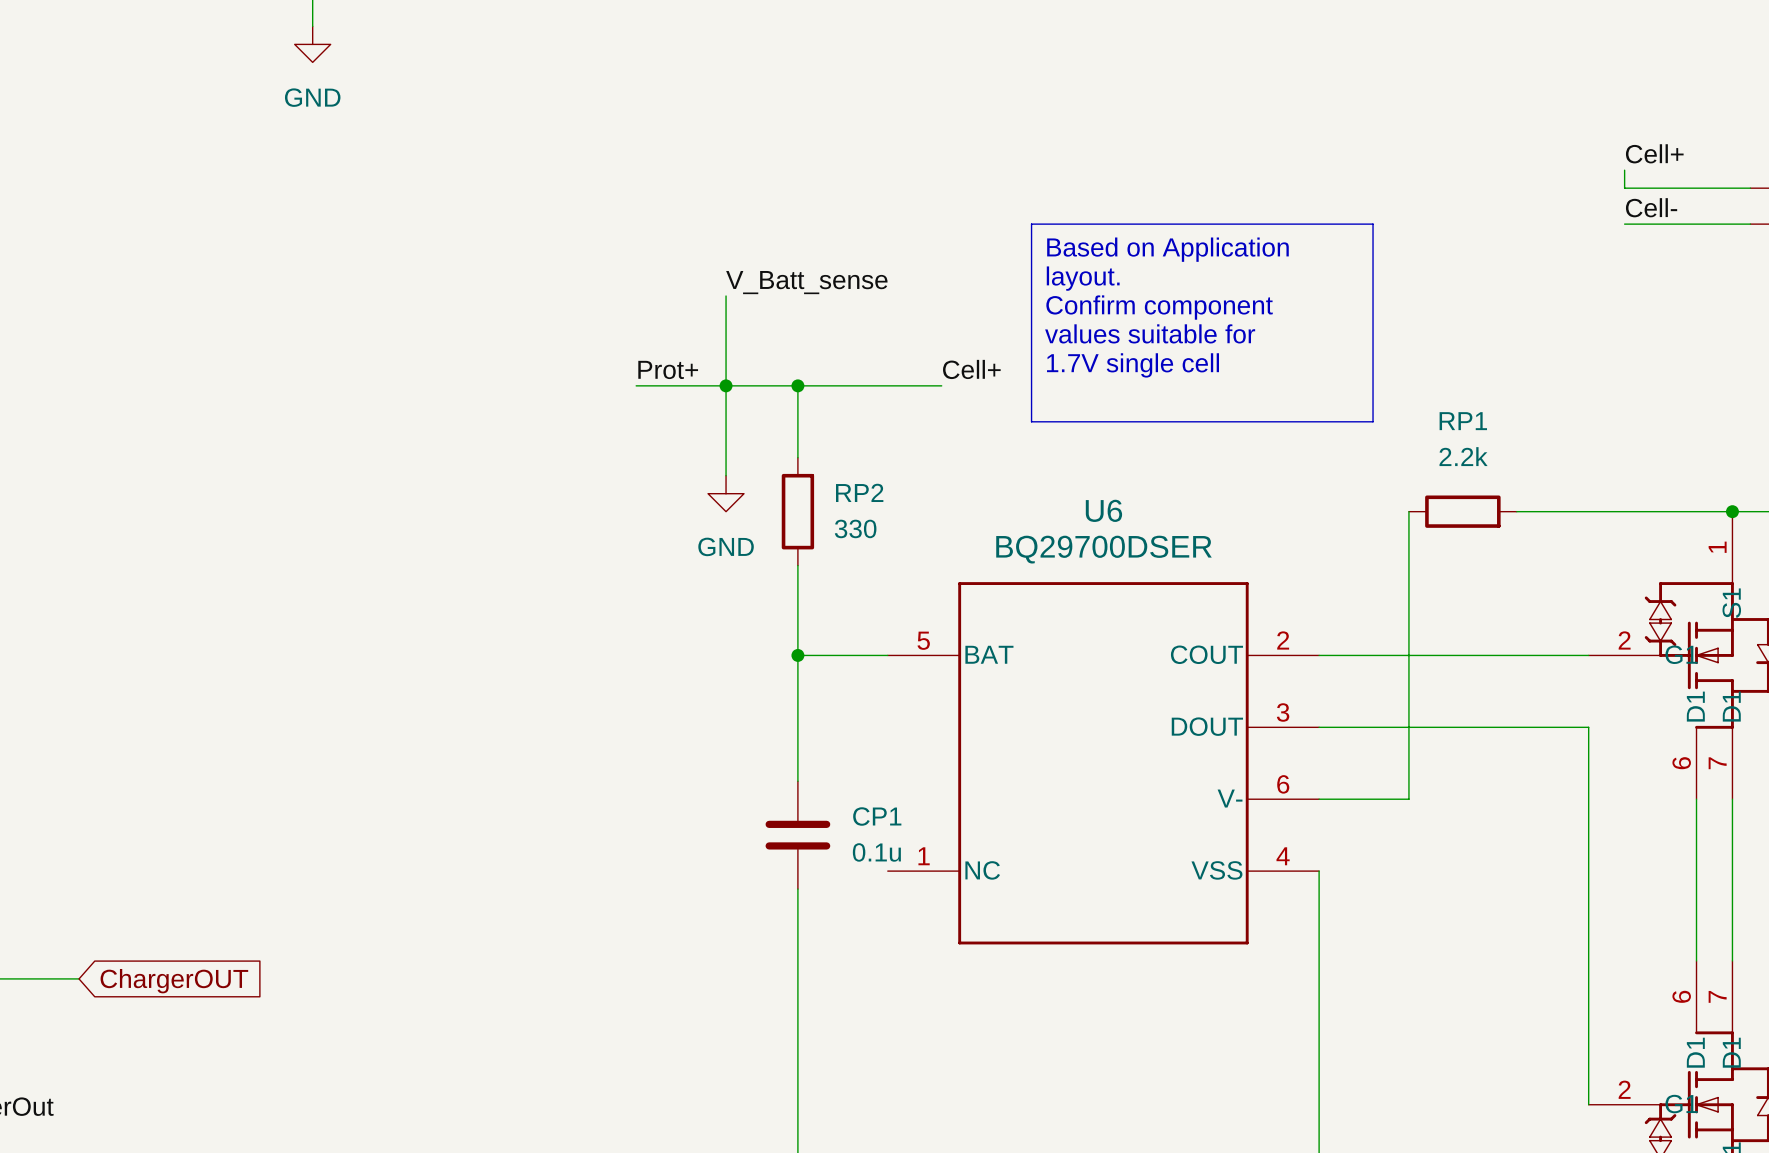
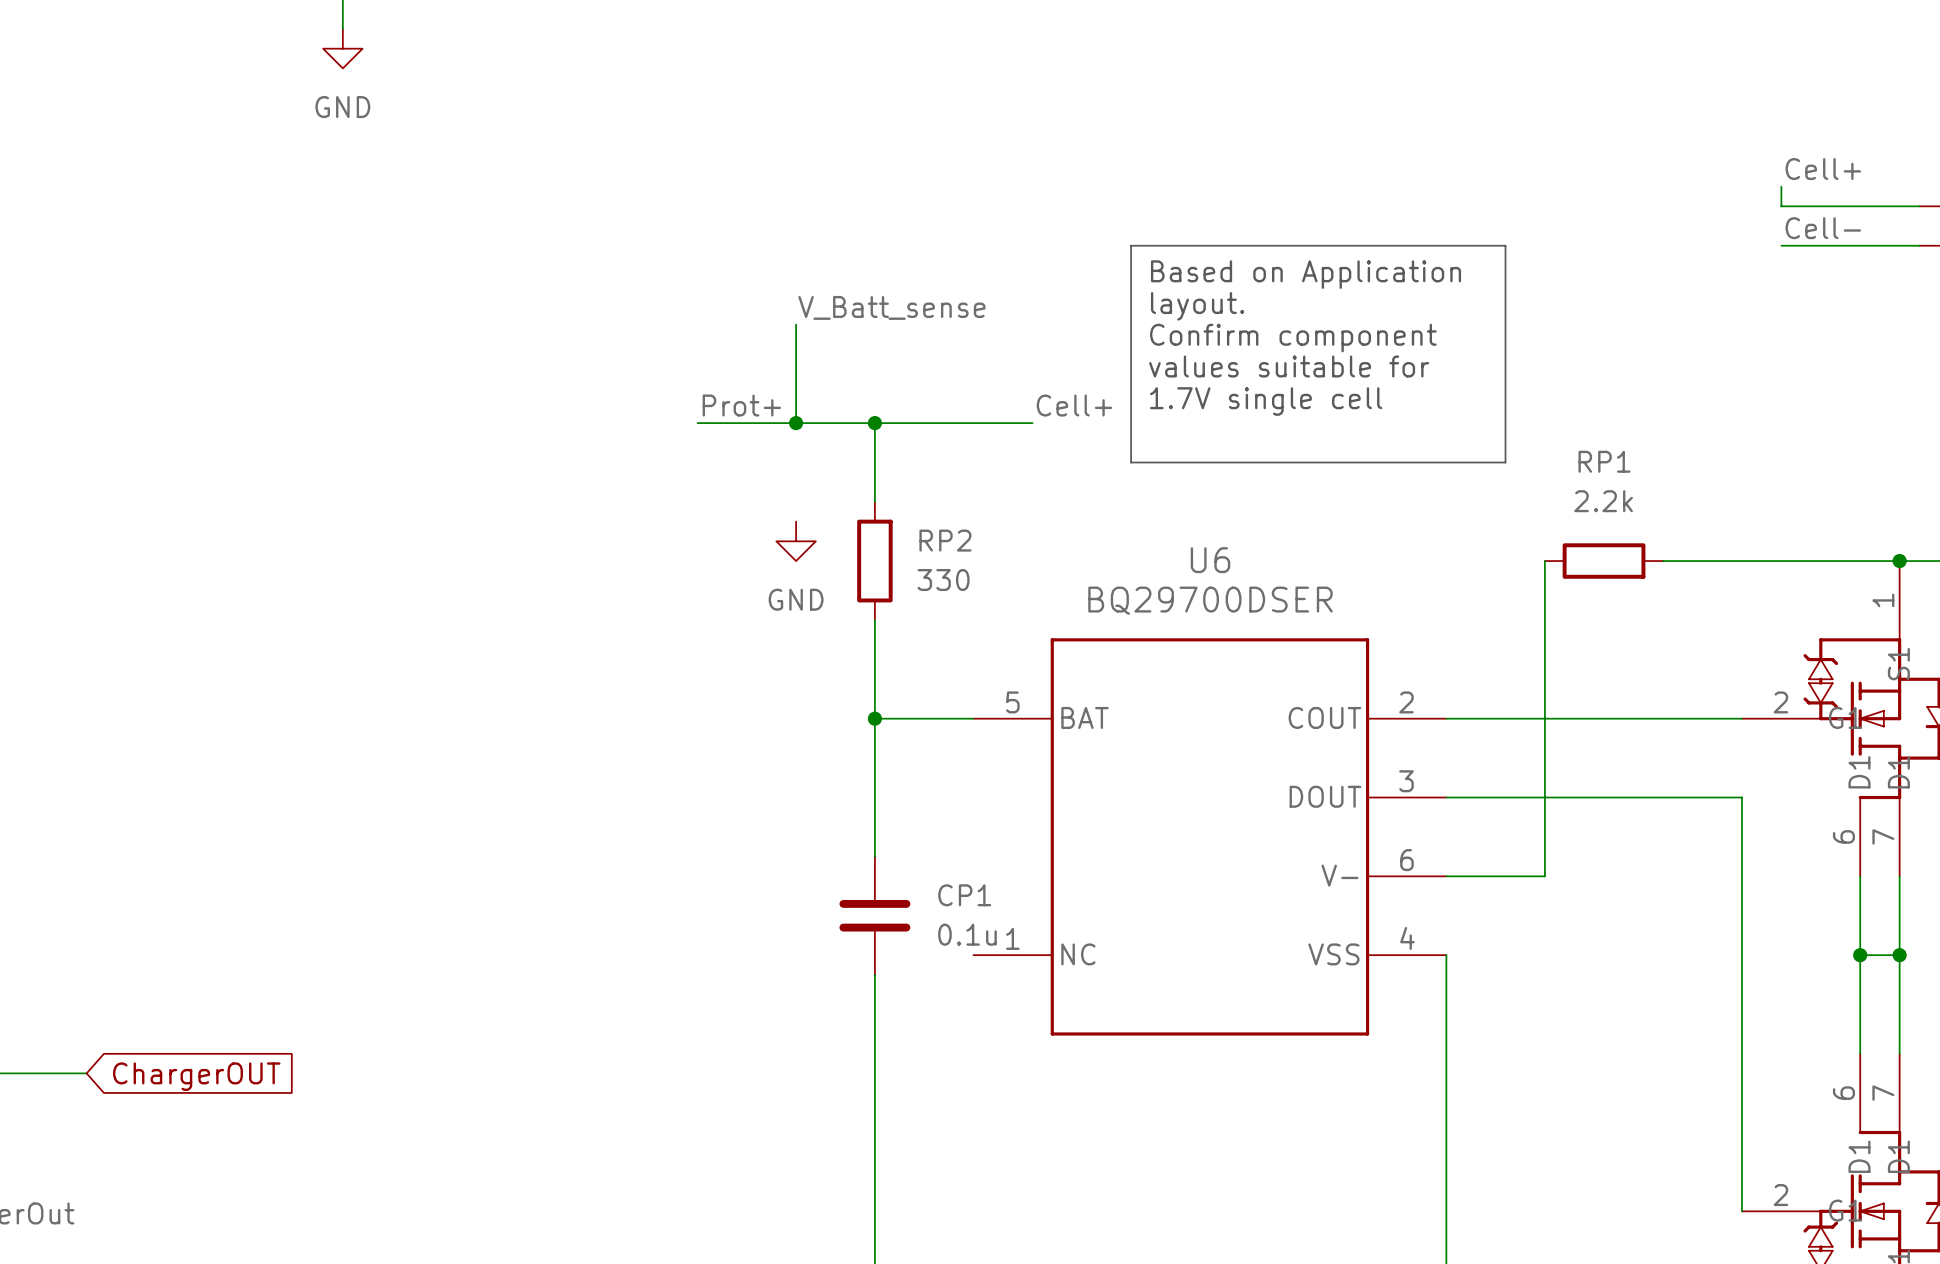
wire: (726, 385) (726, 475) -> none
wire: none -> (1860, 955) (1899, 955)
junction: none -> (1860, 955)
junction: none -> (1899, 955)

